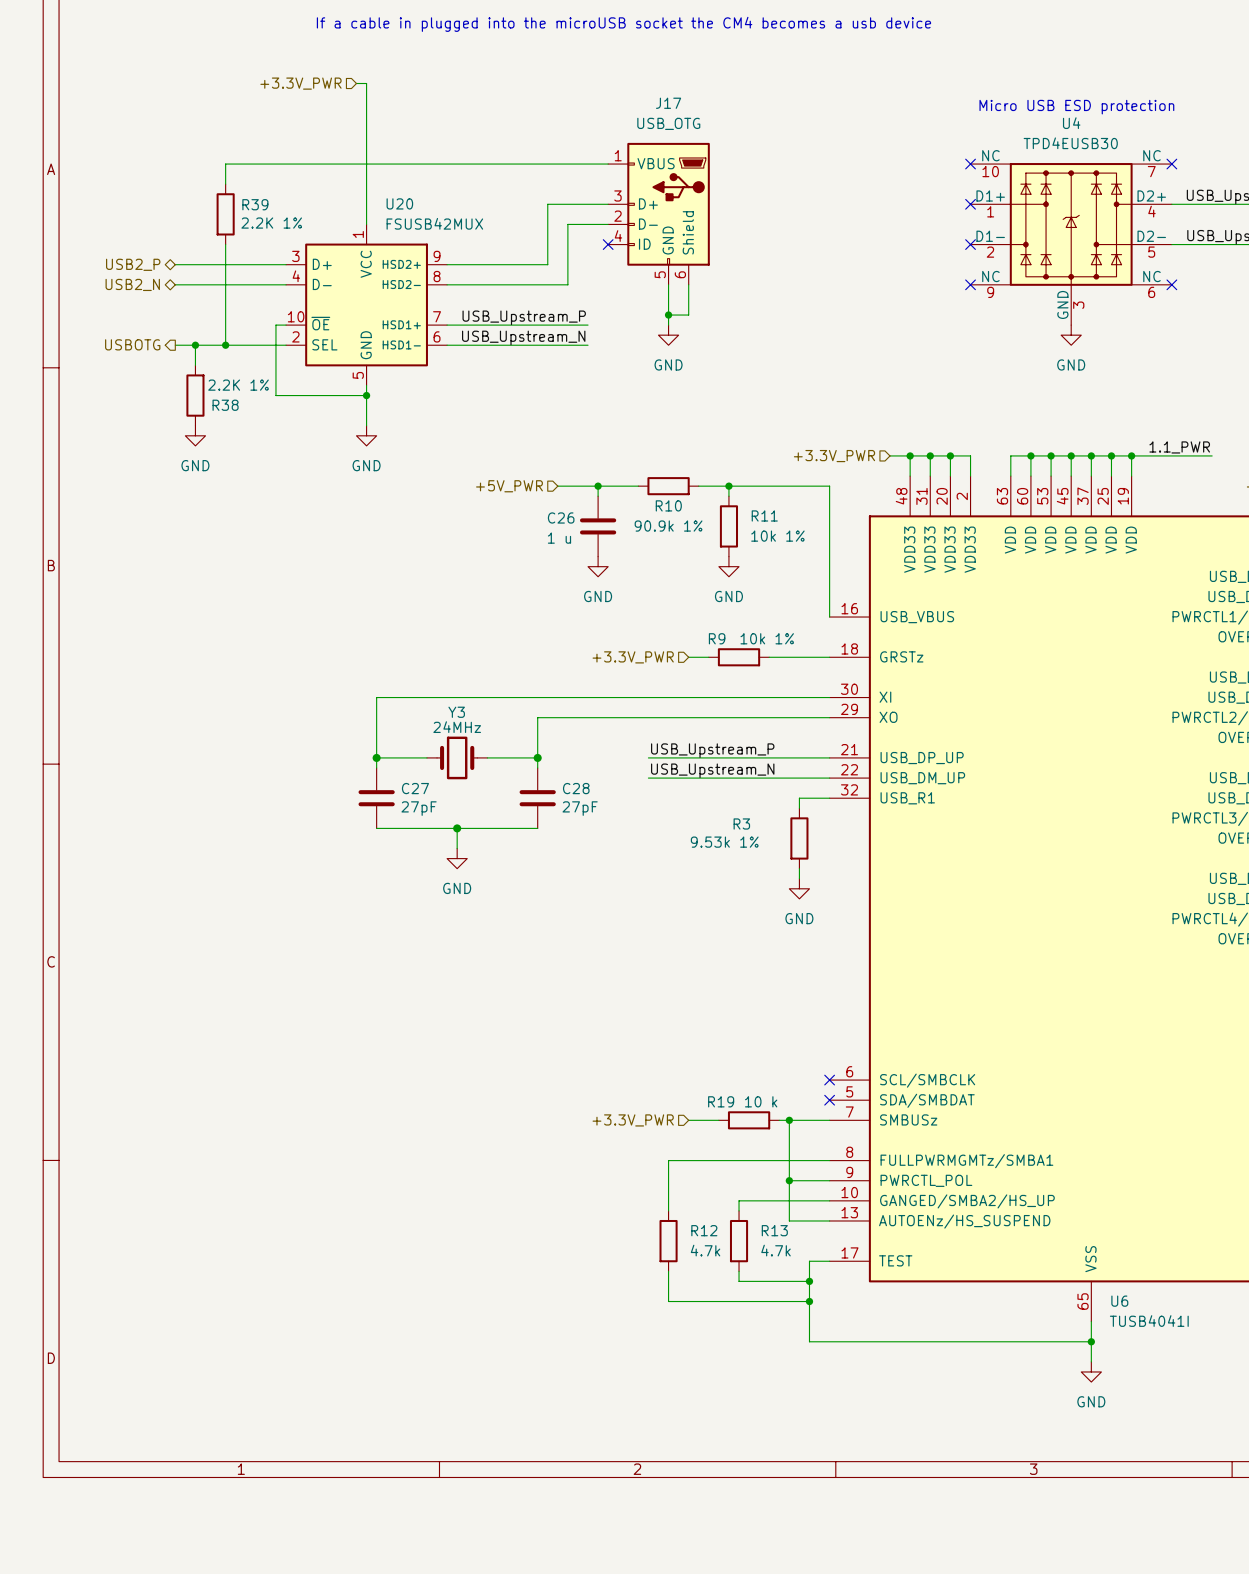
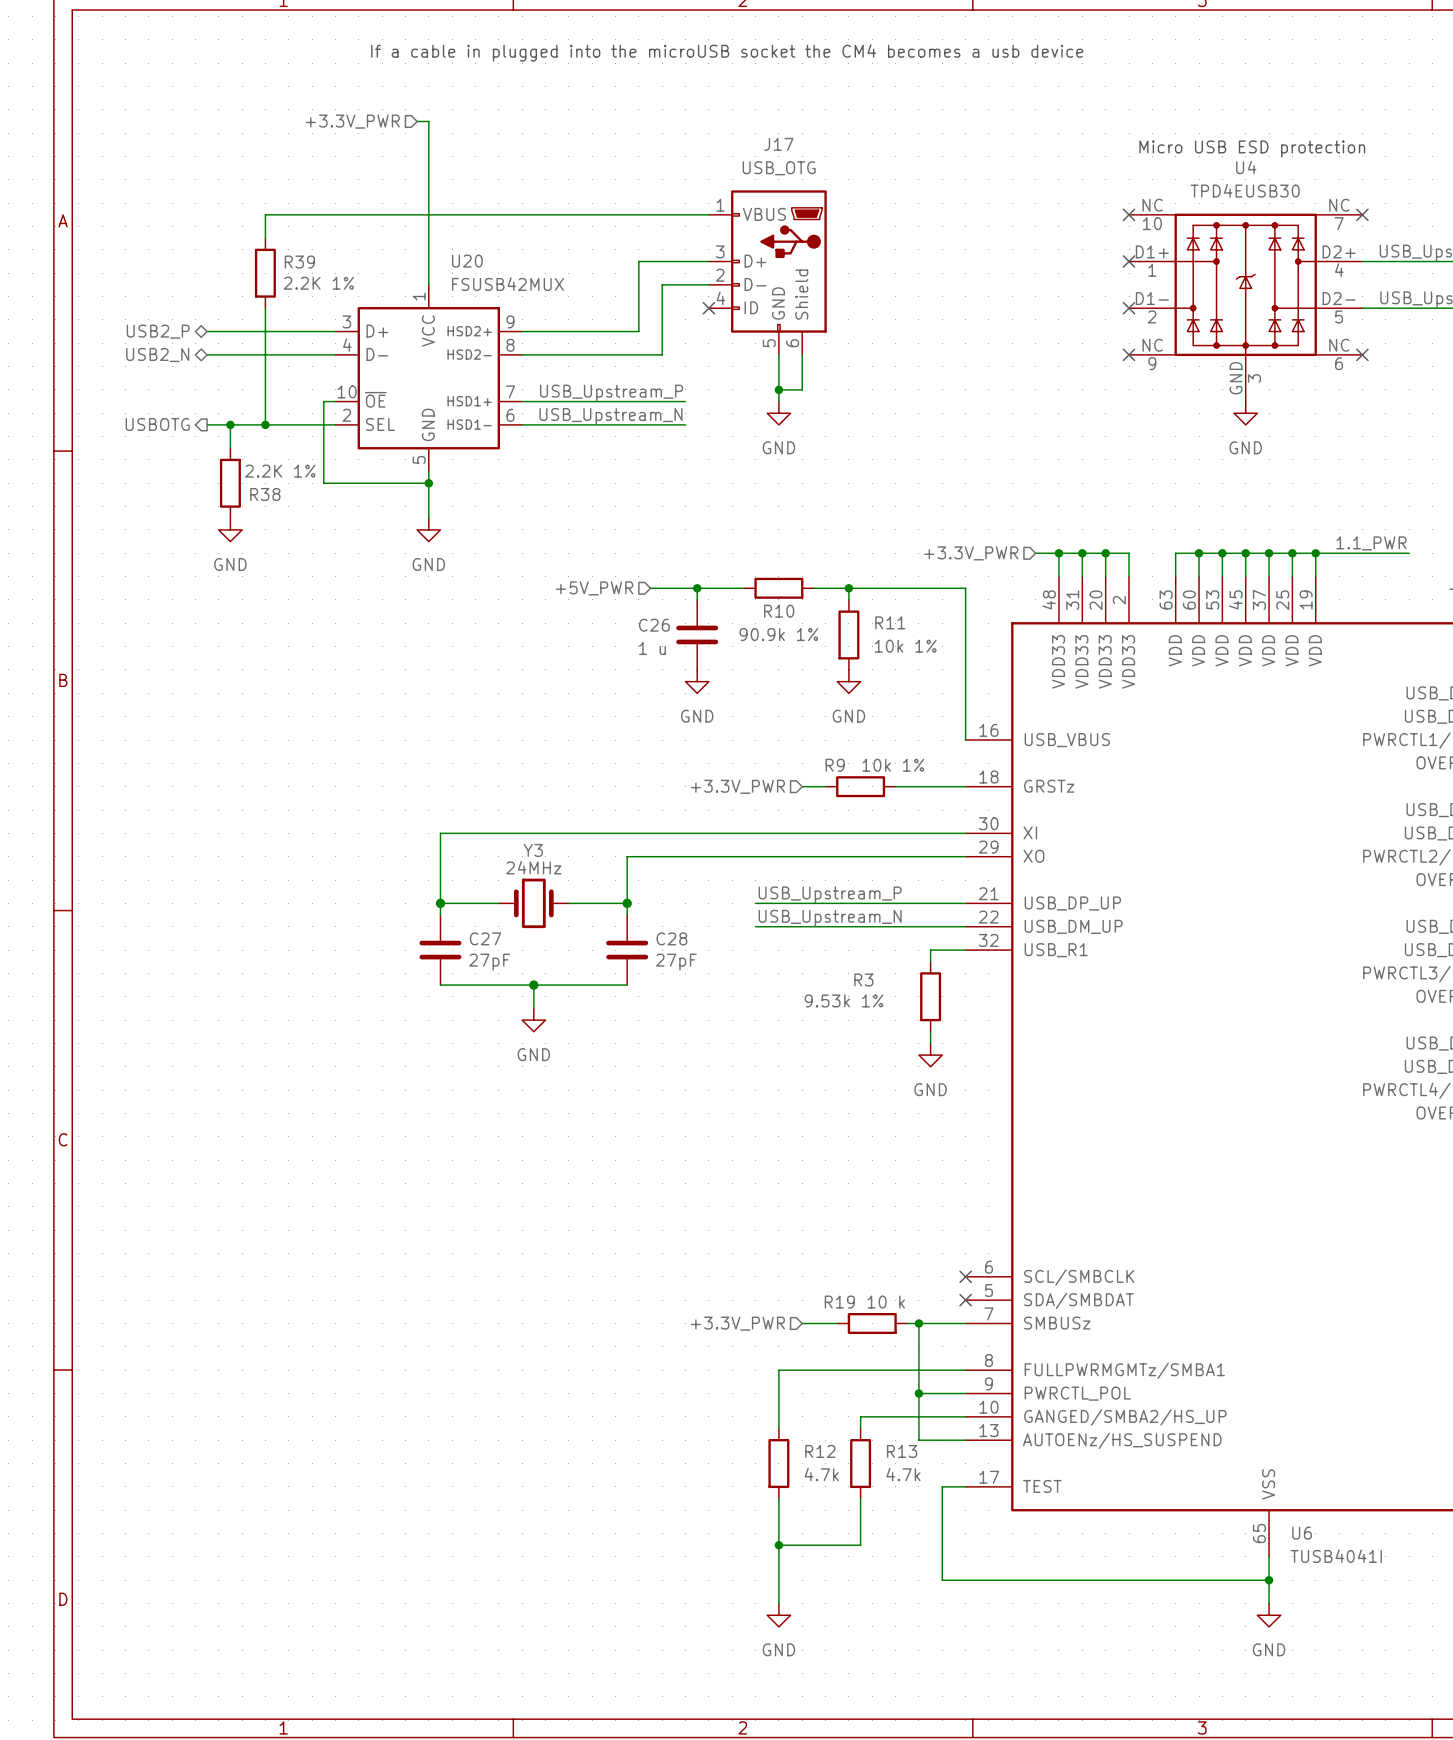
wire: (739, 1281) (809, 1281) -> (860, 1510) (860, 1545) (778, 1545)
junction: (809, 1281) -> none
wire: (668, 1301) (809, 1301) -> (778, 1533) (778, 1603)
junction: (809, 1301) -> none
junction: none -> (778, 1545)
power symbol: none -> GND (778, 1615)

